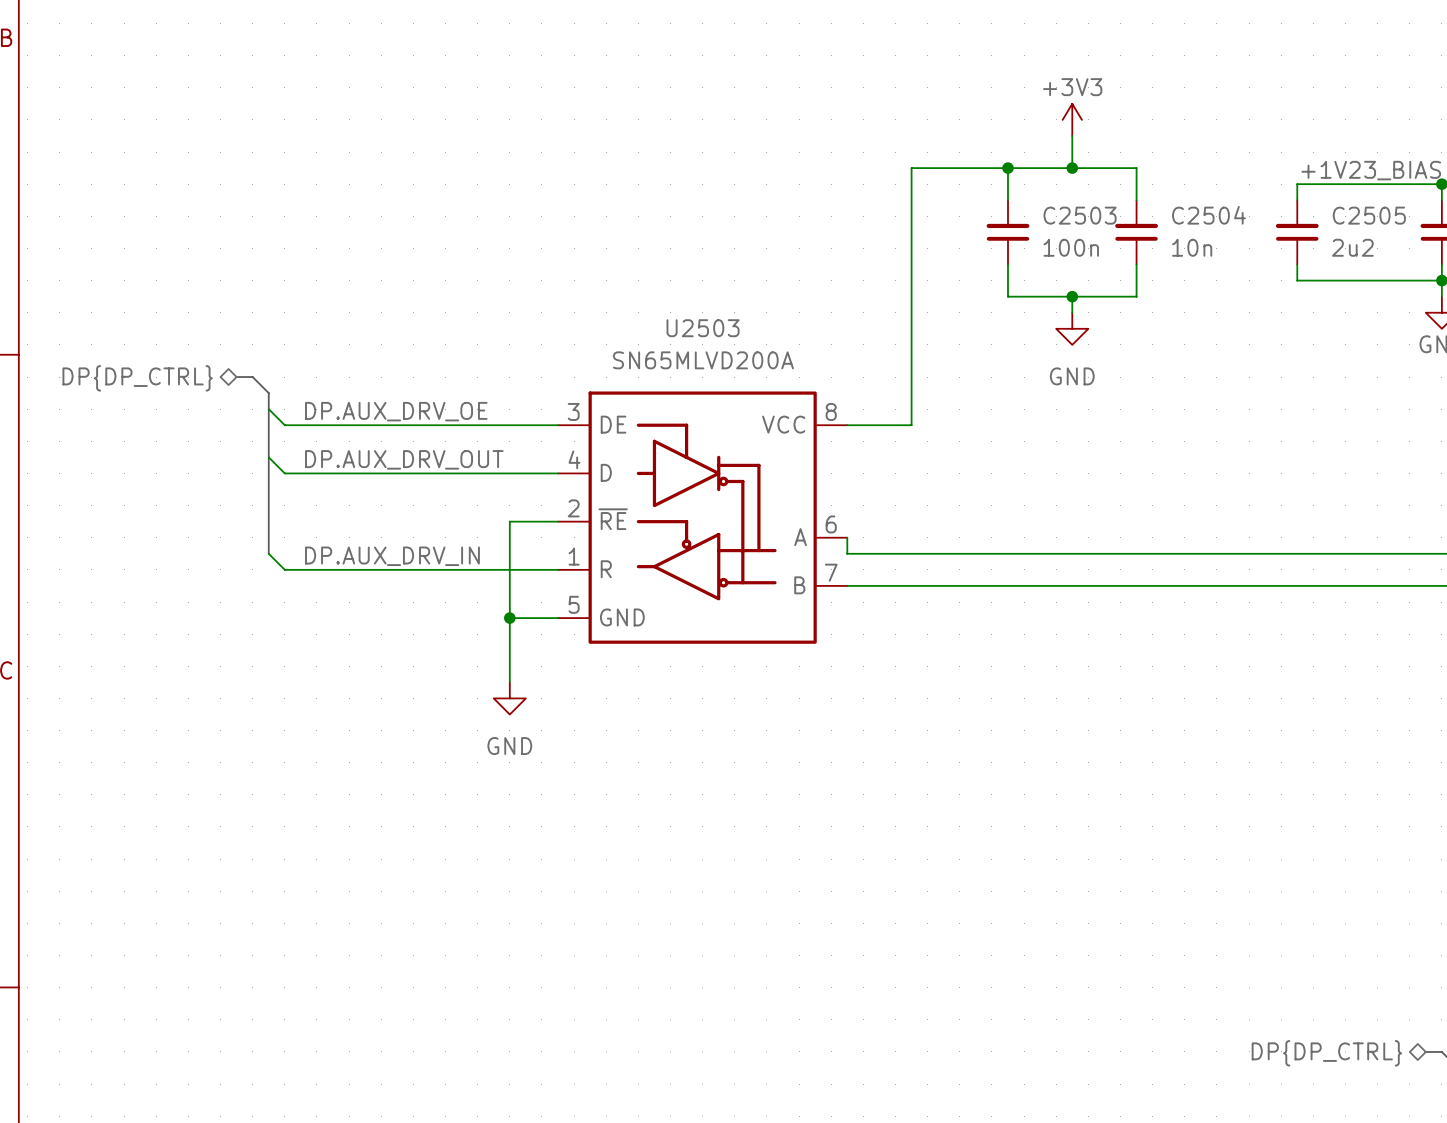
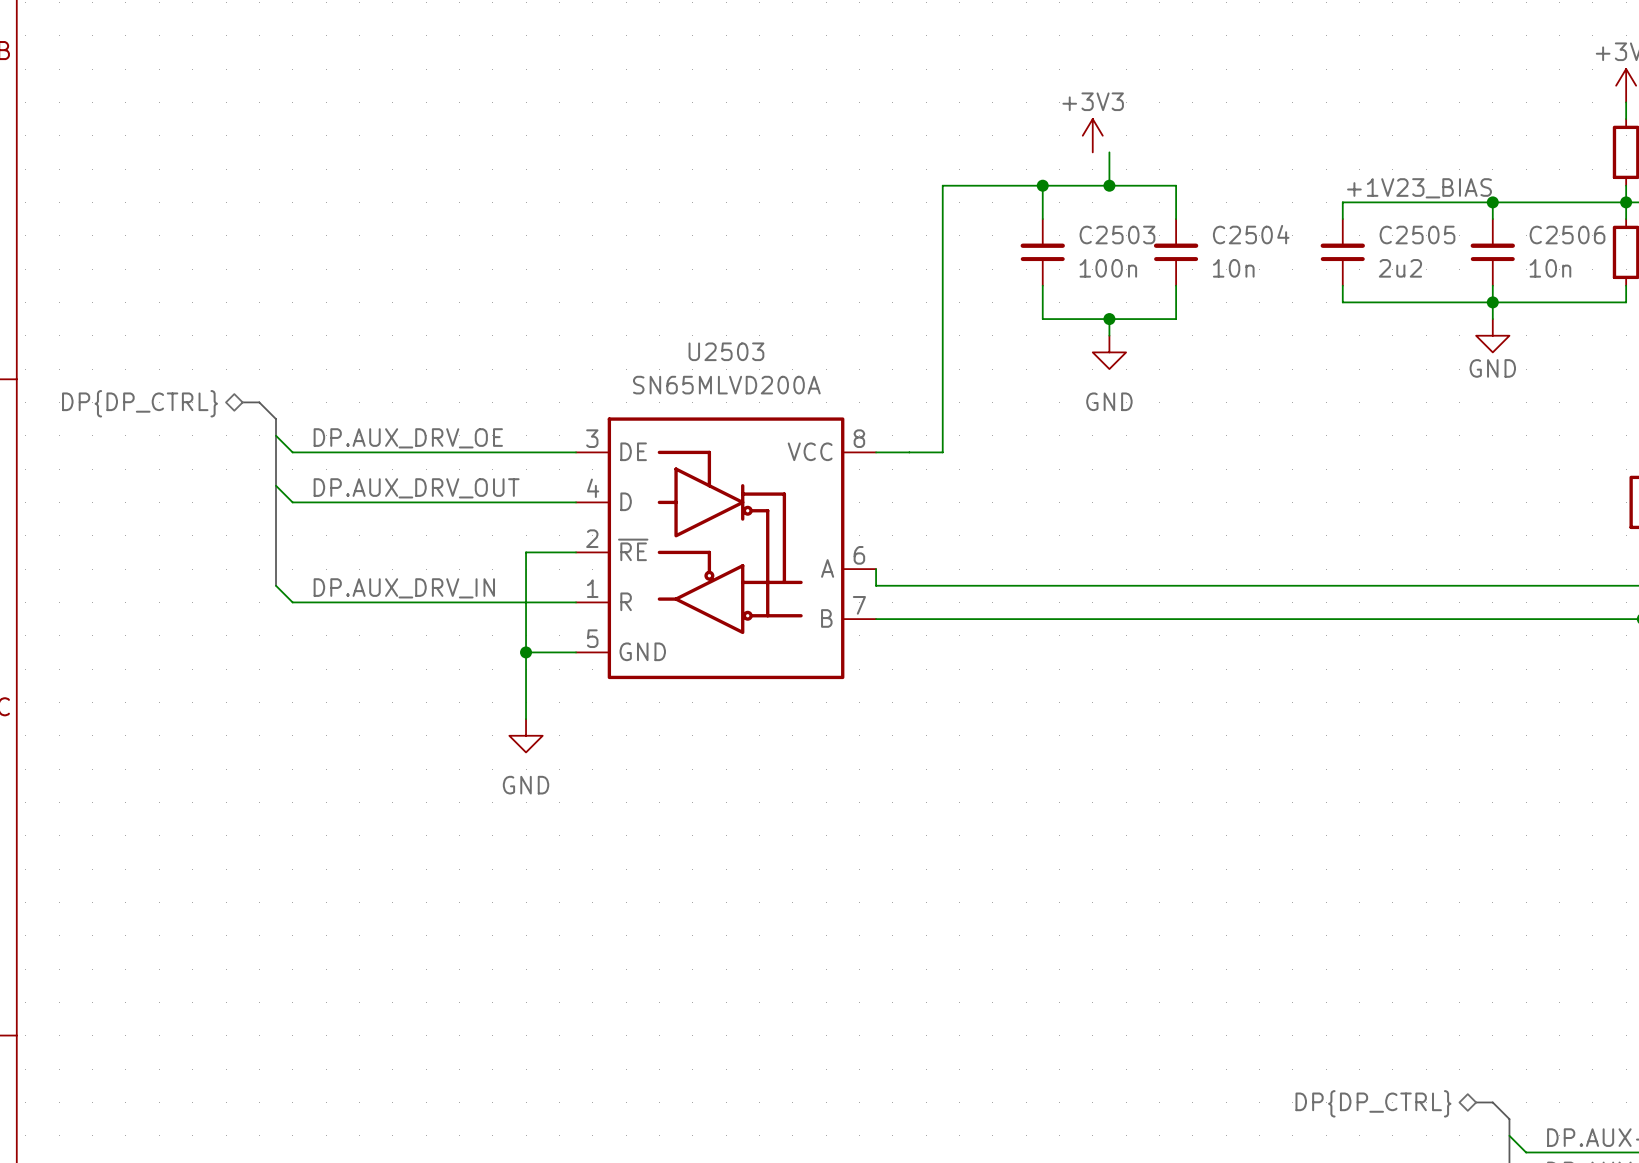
power symbol position: +3V3 (1072, 119) -> +3V3 (1092, 135)

